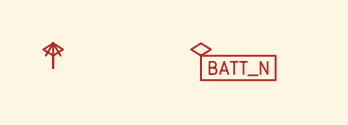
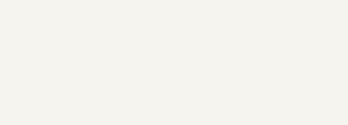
power symbol: (53, 55) -> none
power symbol: (53, 55) -> none
power symbol: (200, 55) -> none
global label: BATT_N (238, 68) -> none

